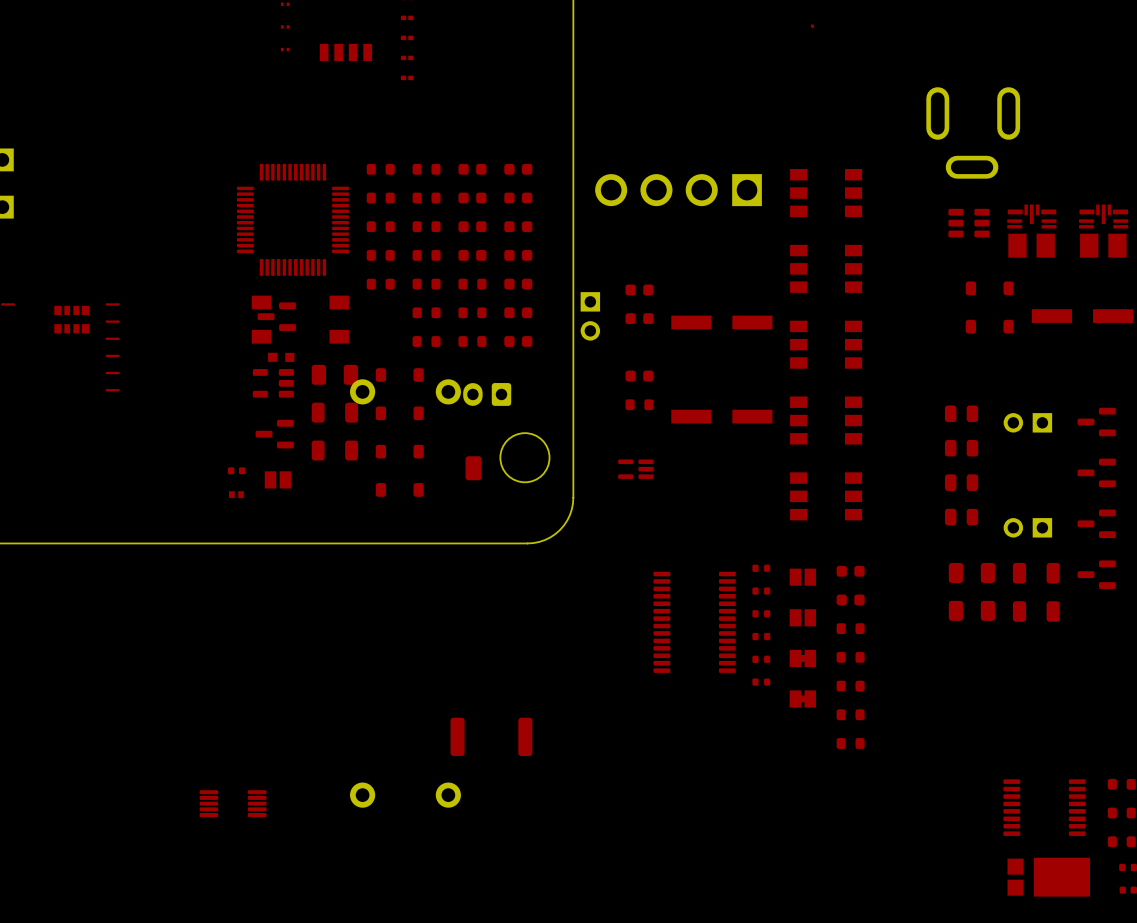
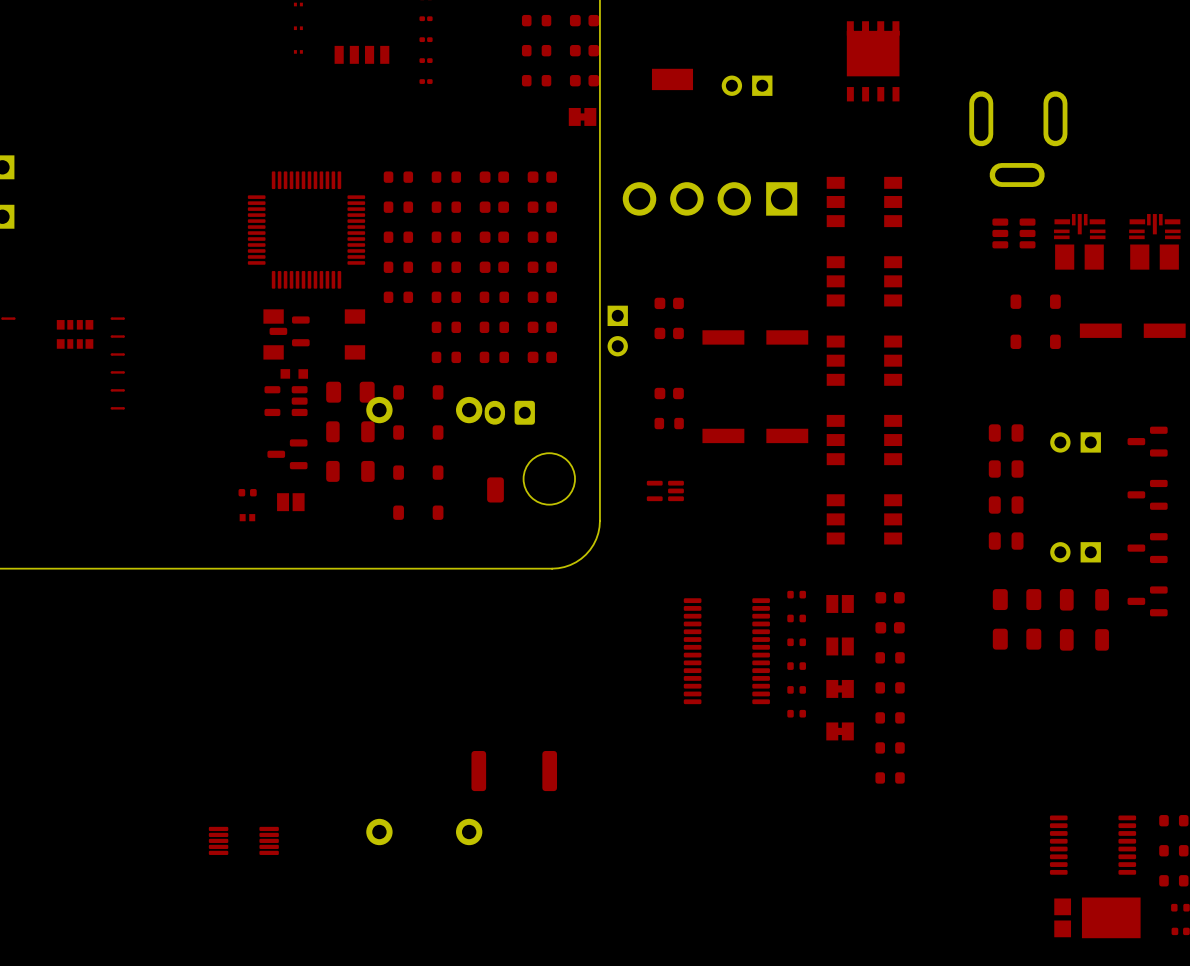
part: none -> (536, 20)
part: none -> (584, 20)
part: none -> (536, 50)
part: none -> (584, 50)
part: none -> (873, 61)
part: none -> (672, 79)
part: none -> (536, 80)
part: none -> (584, 80)
part: none -> (747, 85)
part: none -> (582, 116)

